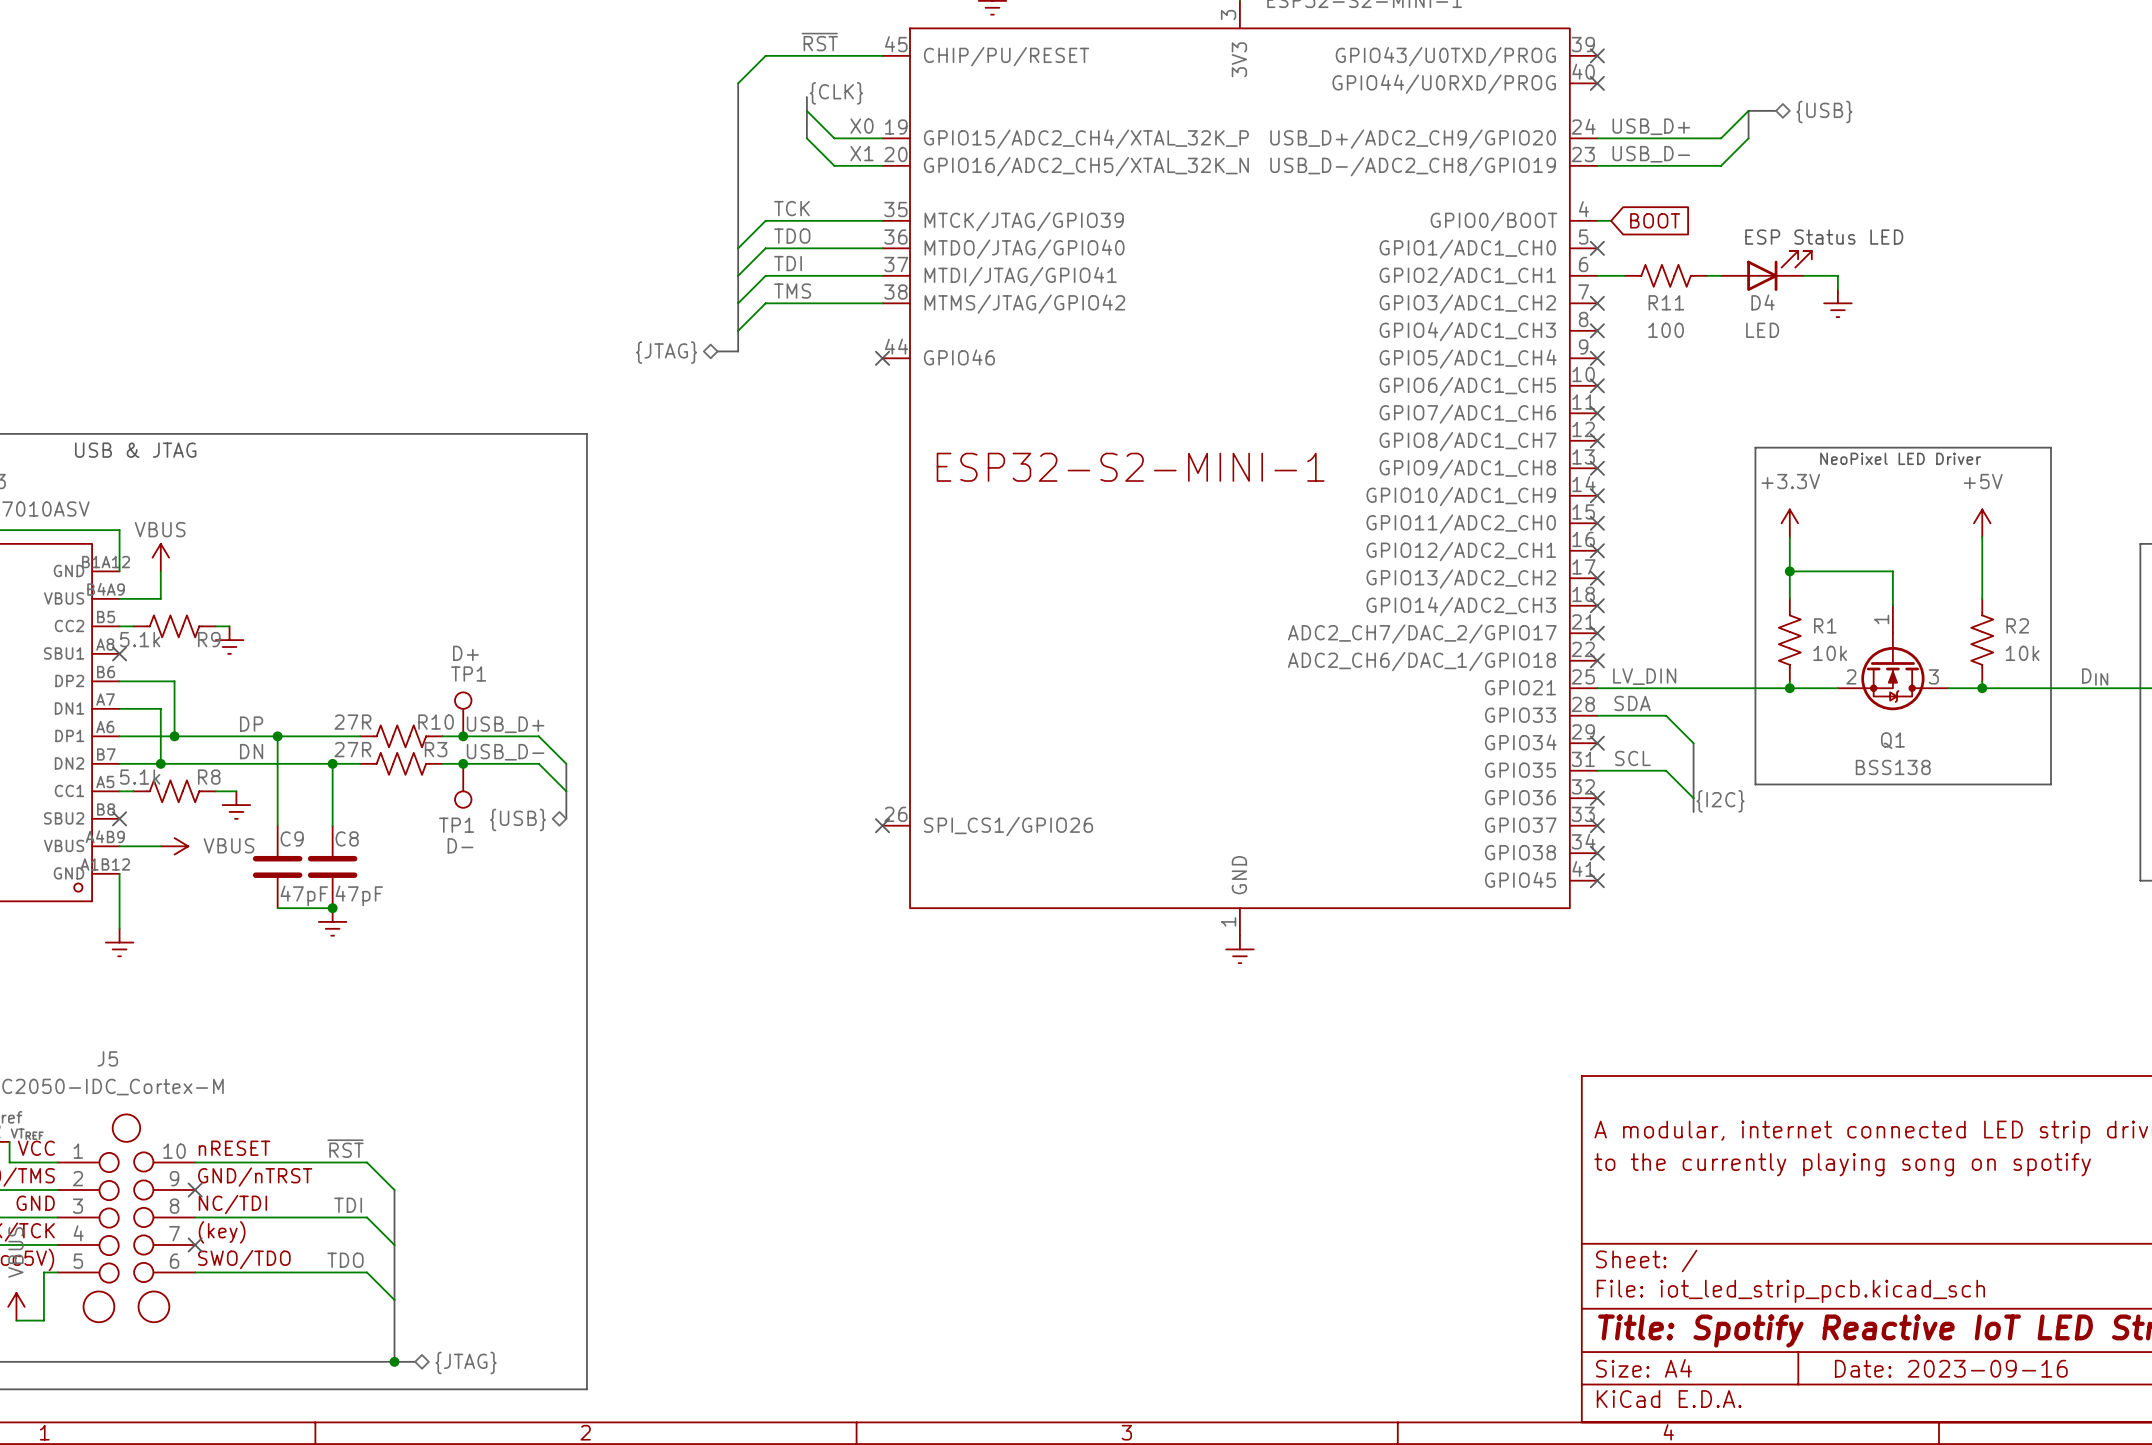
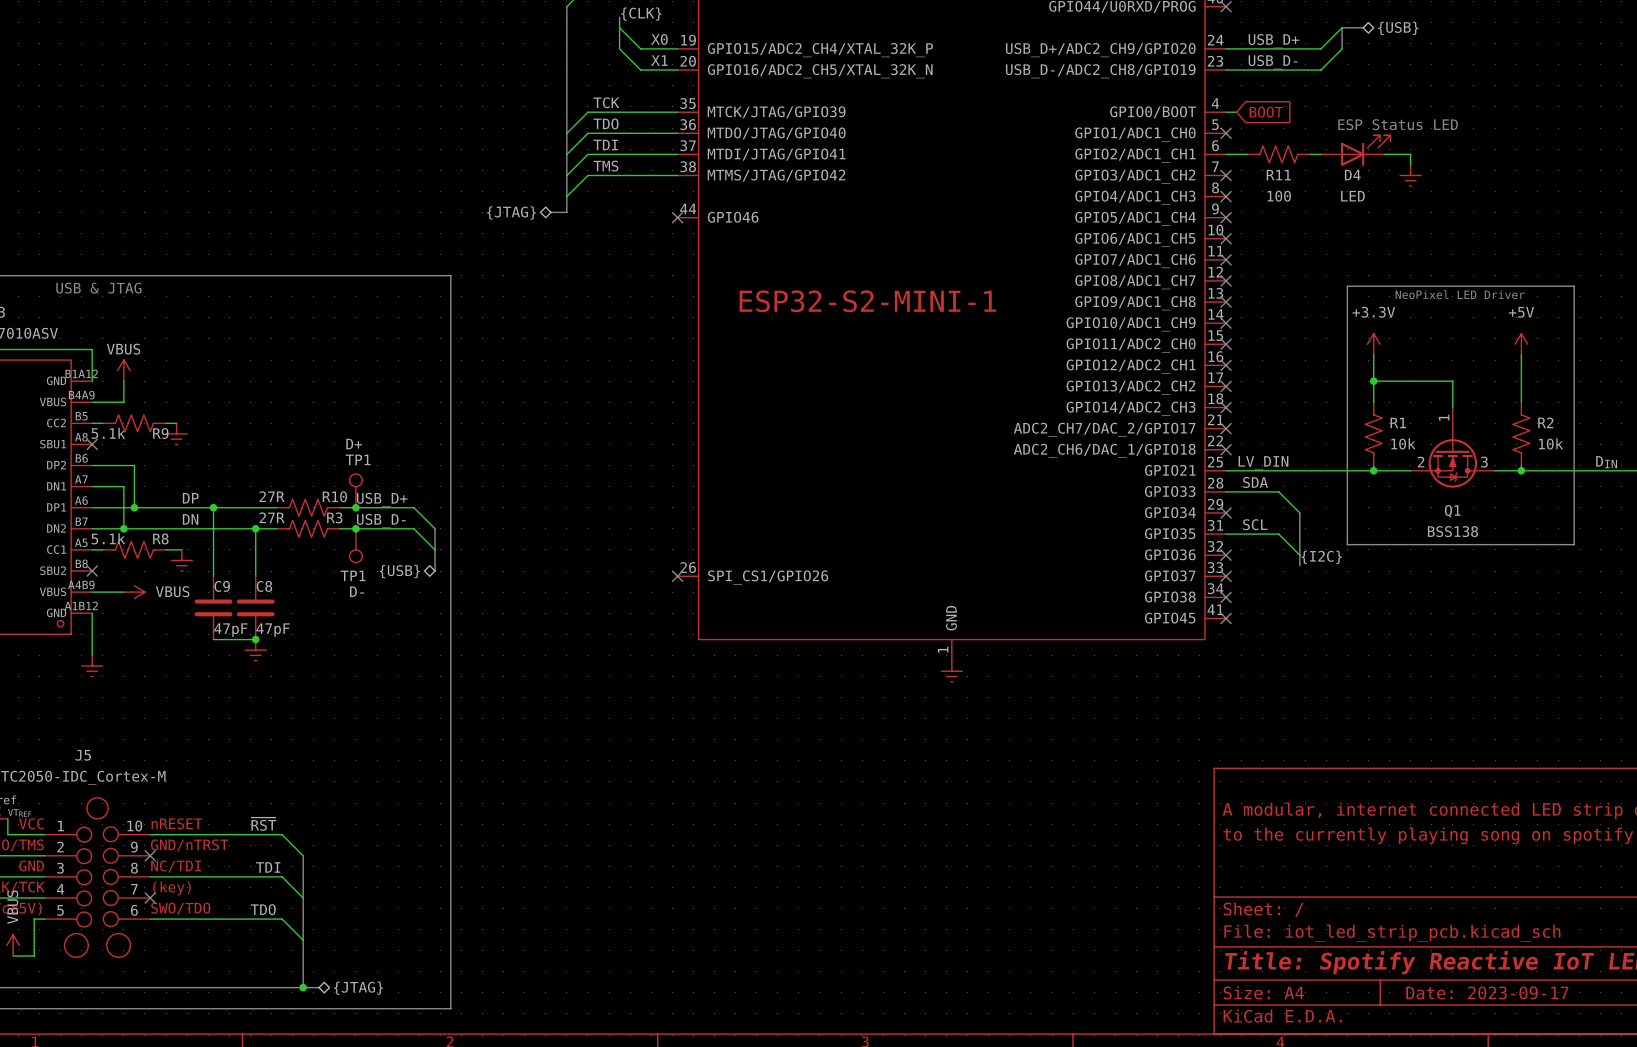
title block: Date: 2023-09-16 (1951, 1368) -> Date: 2023-09-17 (1487, 992)

